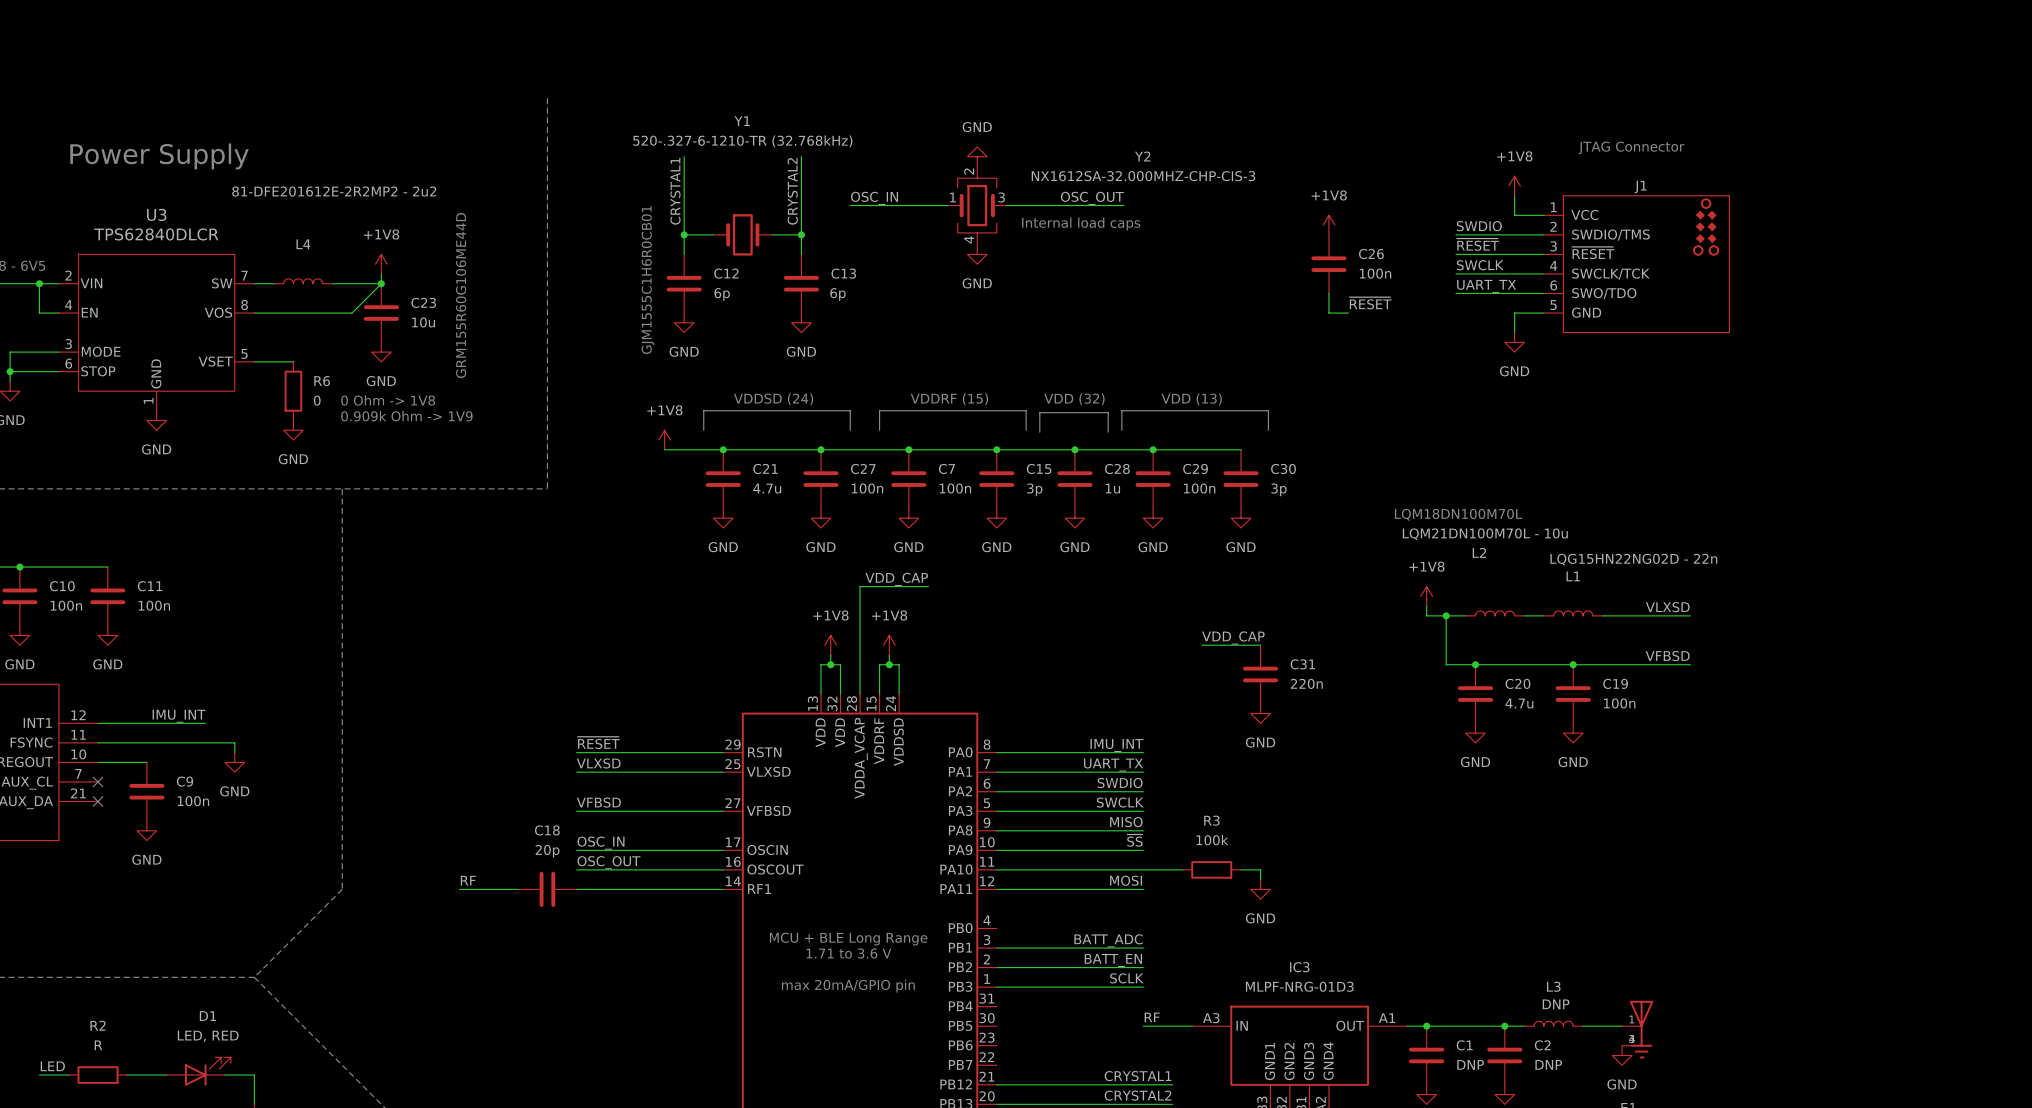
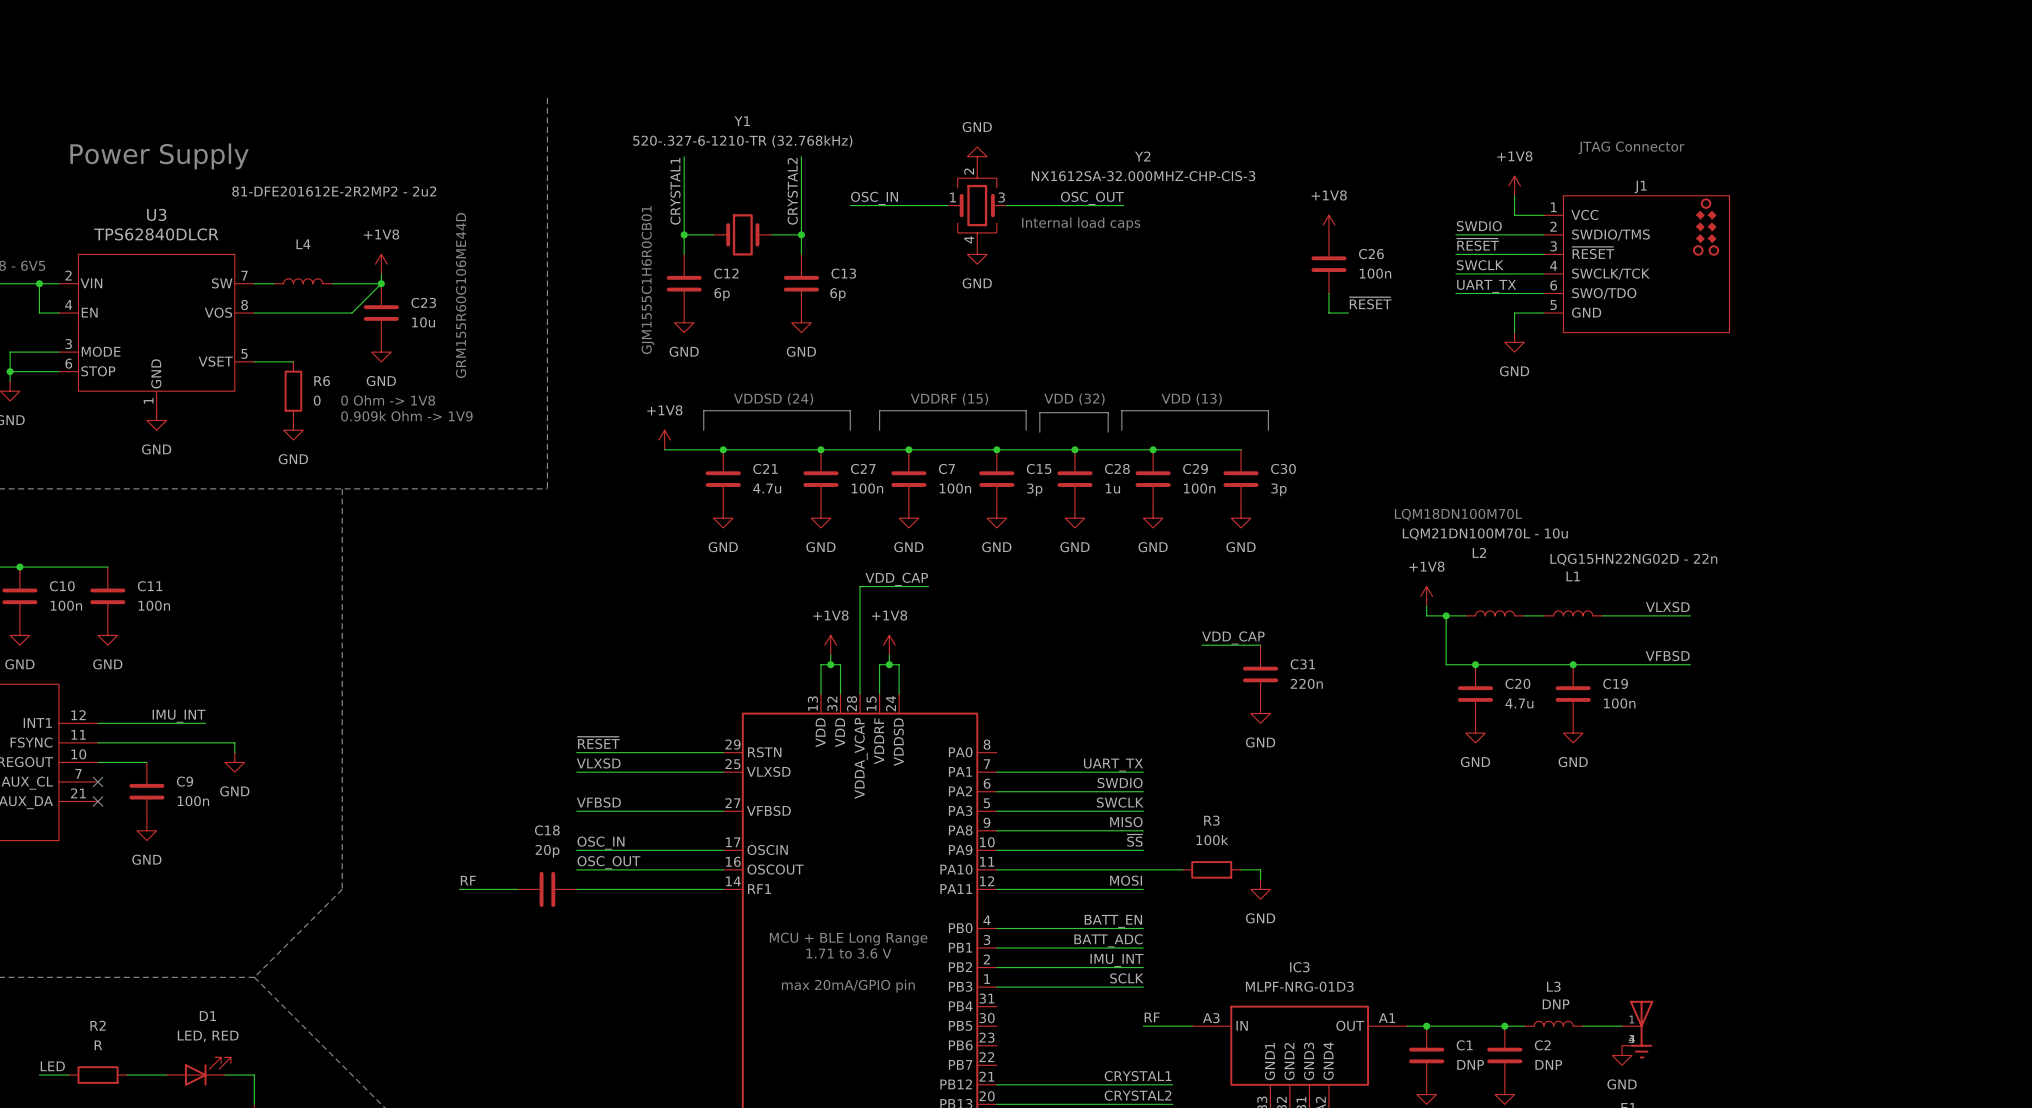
label: IMU_INT (1116, 745) -> none
wire: (996, 752) (1143, 752) -> (996, 928) (1143, 928)
label: none -> BATT_EN (1113, 921)
label: BATT_EN (1113, 960) -> IMU_INT (1116, 960)

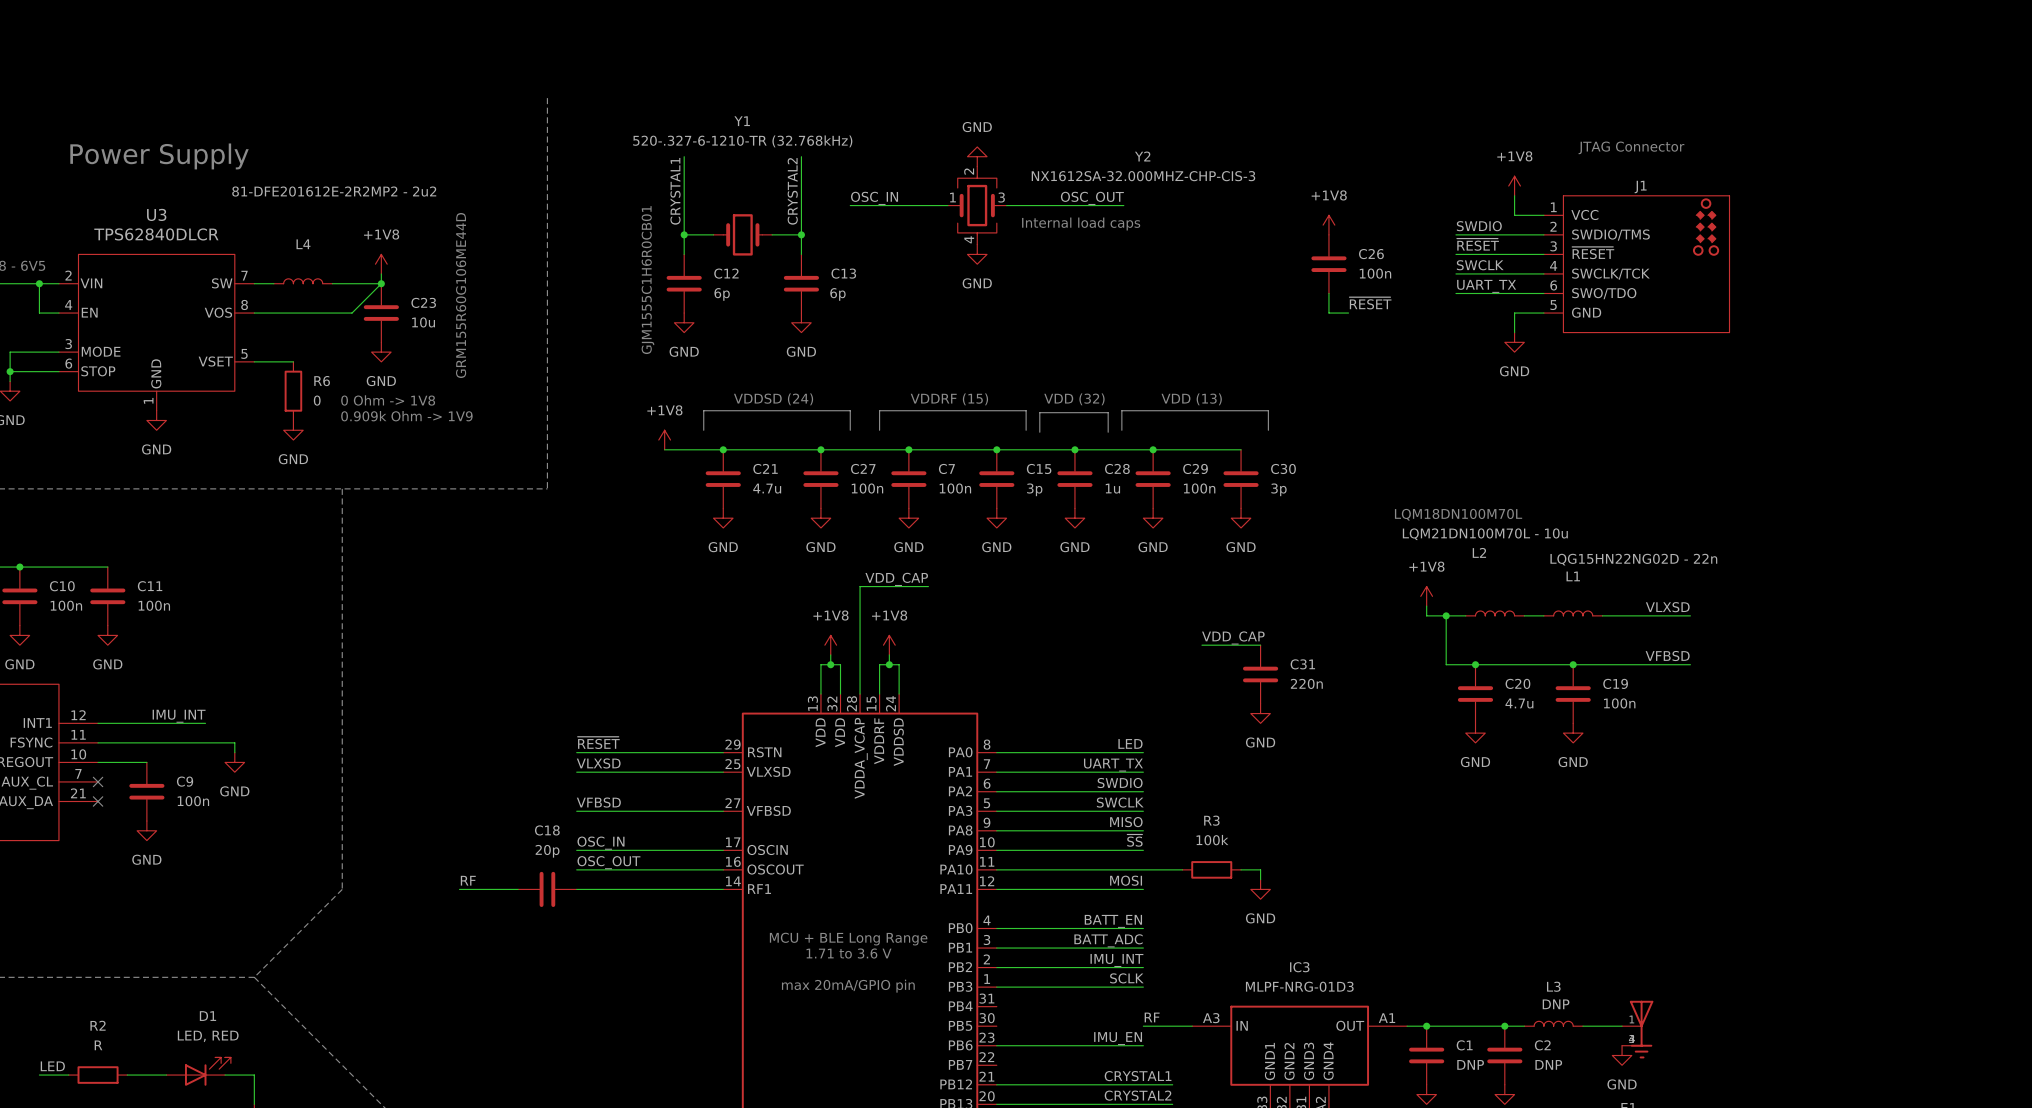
label: none -> LED (1130, 743)
wire: none -> (996, 752) (1143, 752)
label: none -> IMU_EN (1118, 1038)
wire: none -> (996, 1045) (1143, 1045)

